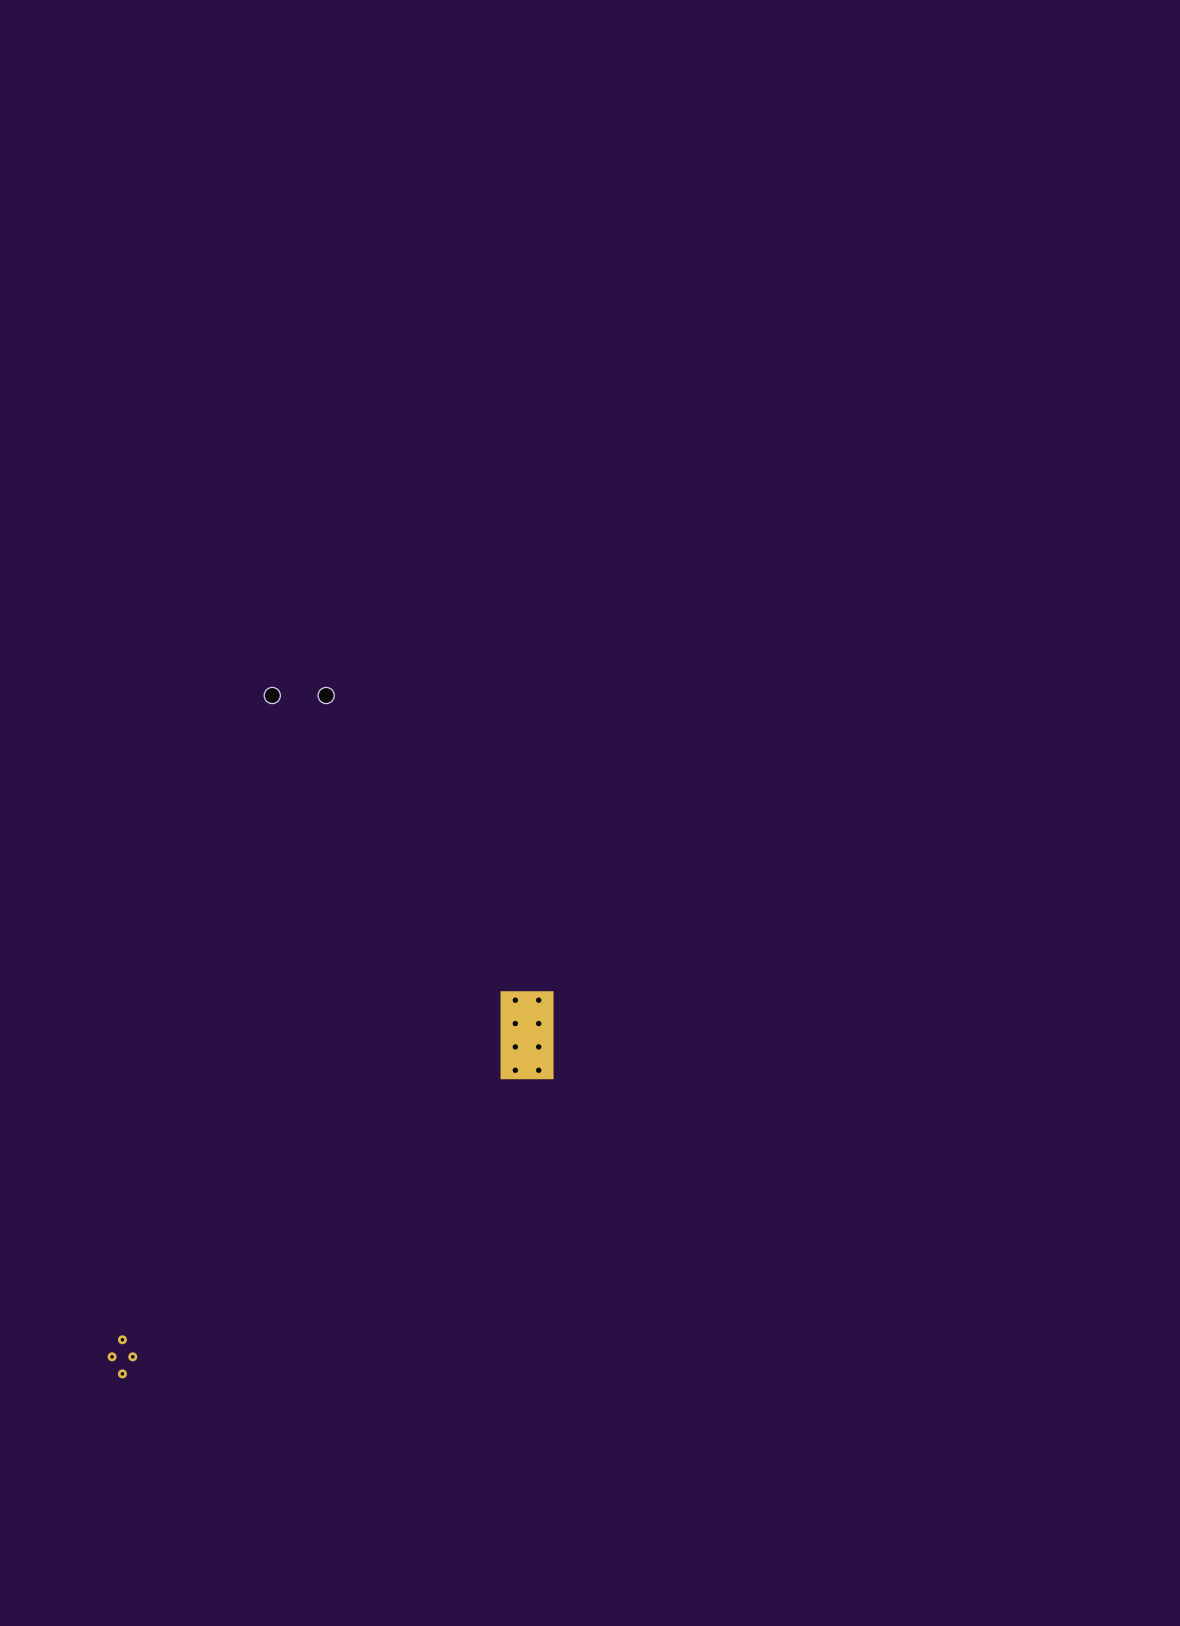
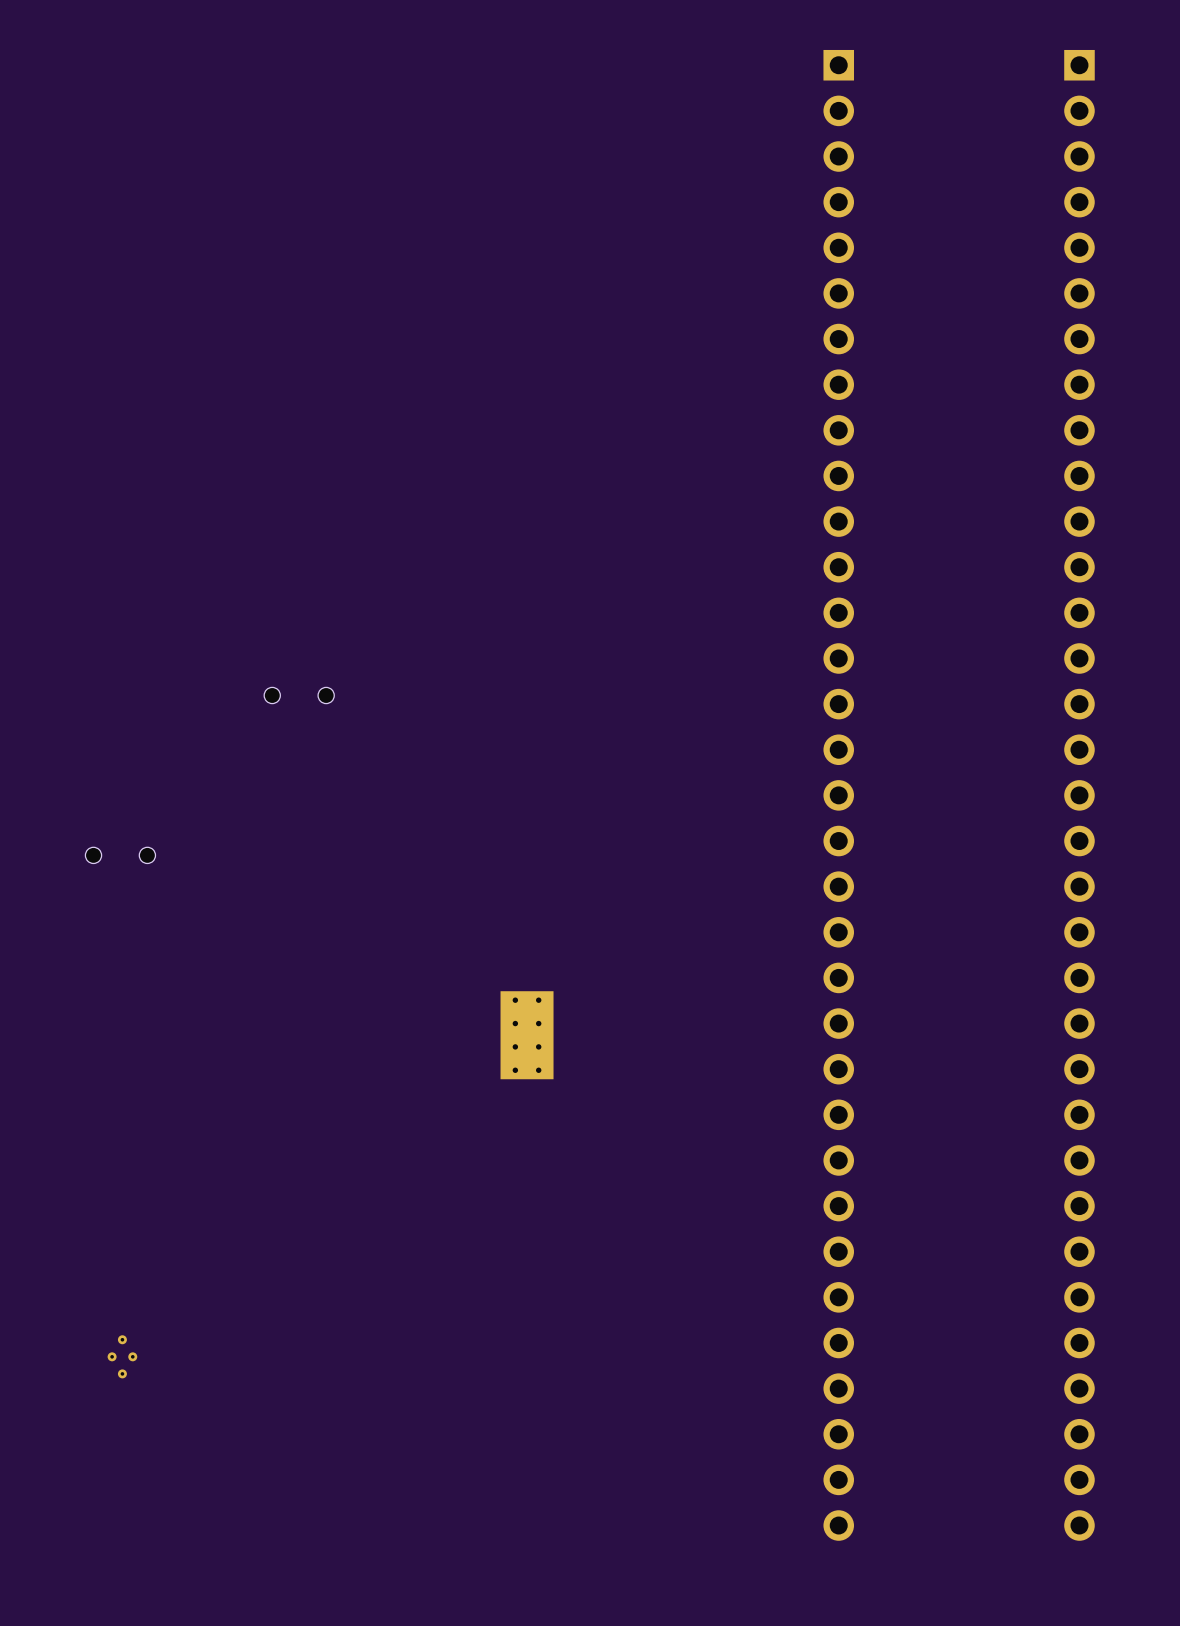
part: none -> (838, 795)
part: none -> (1079, 795)
part: none -> (120, 855)

